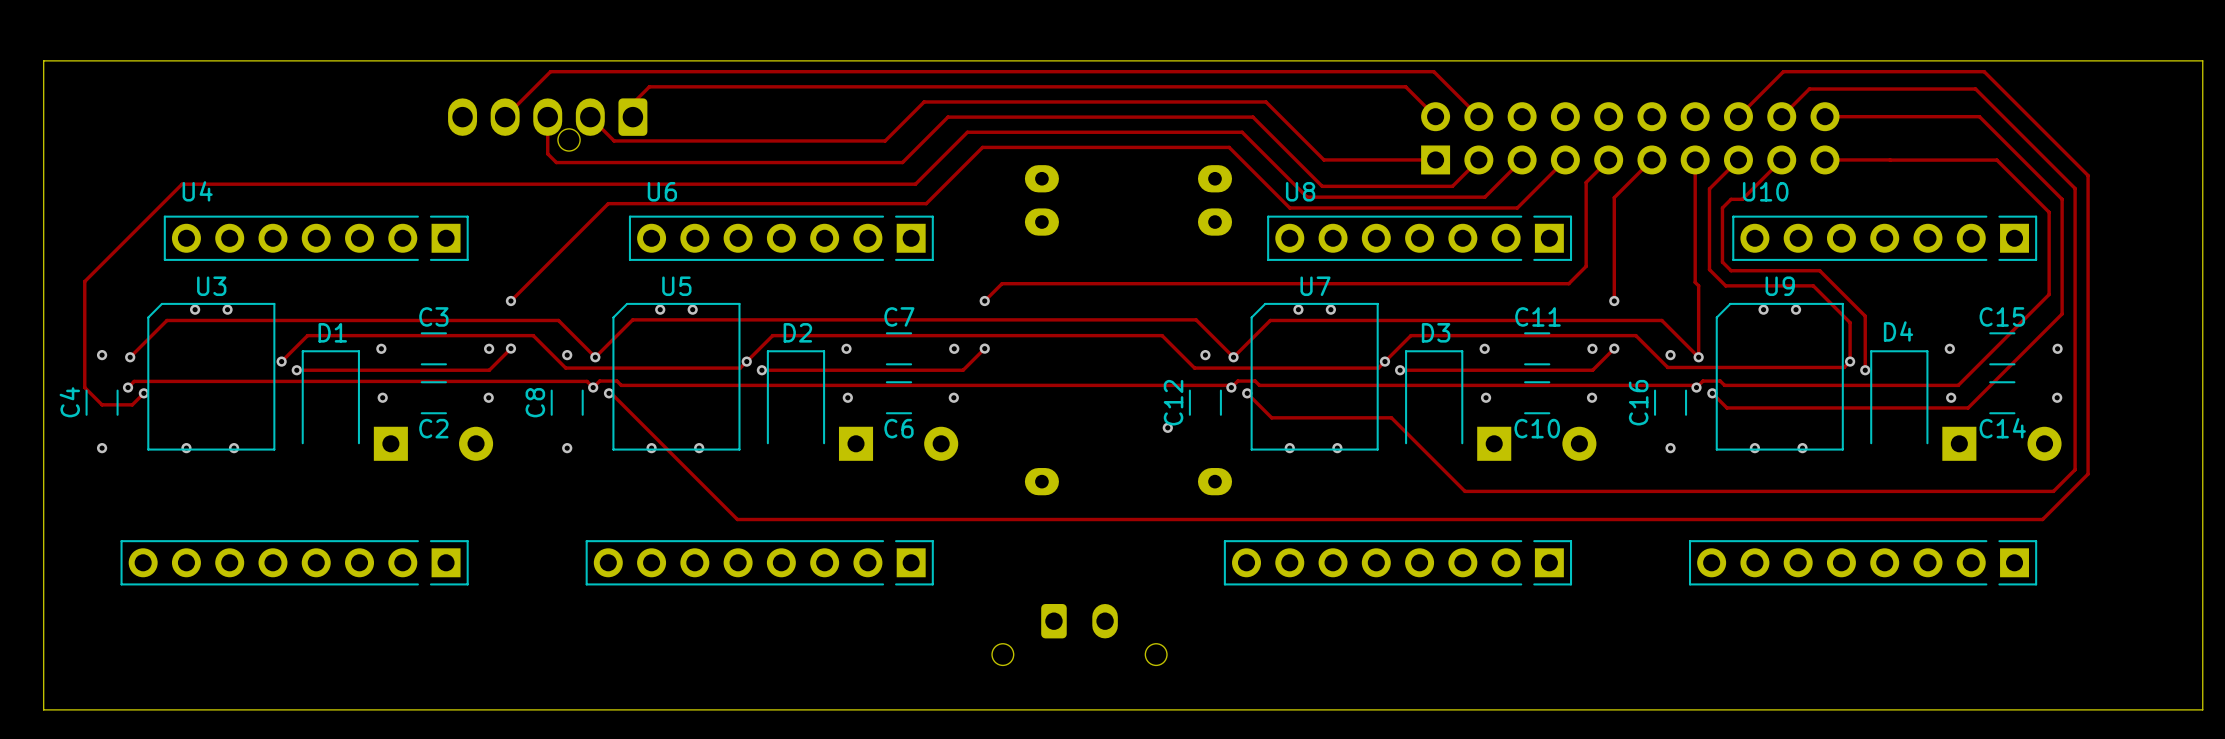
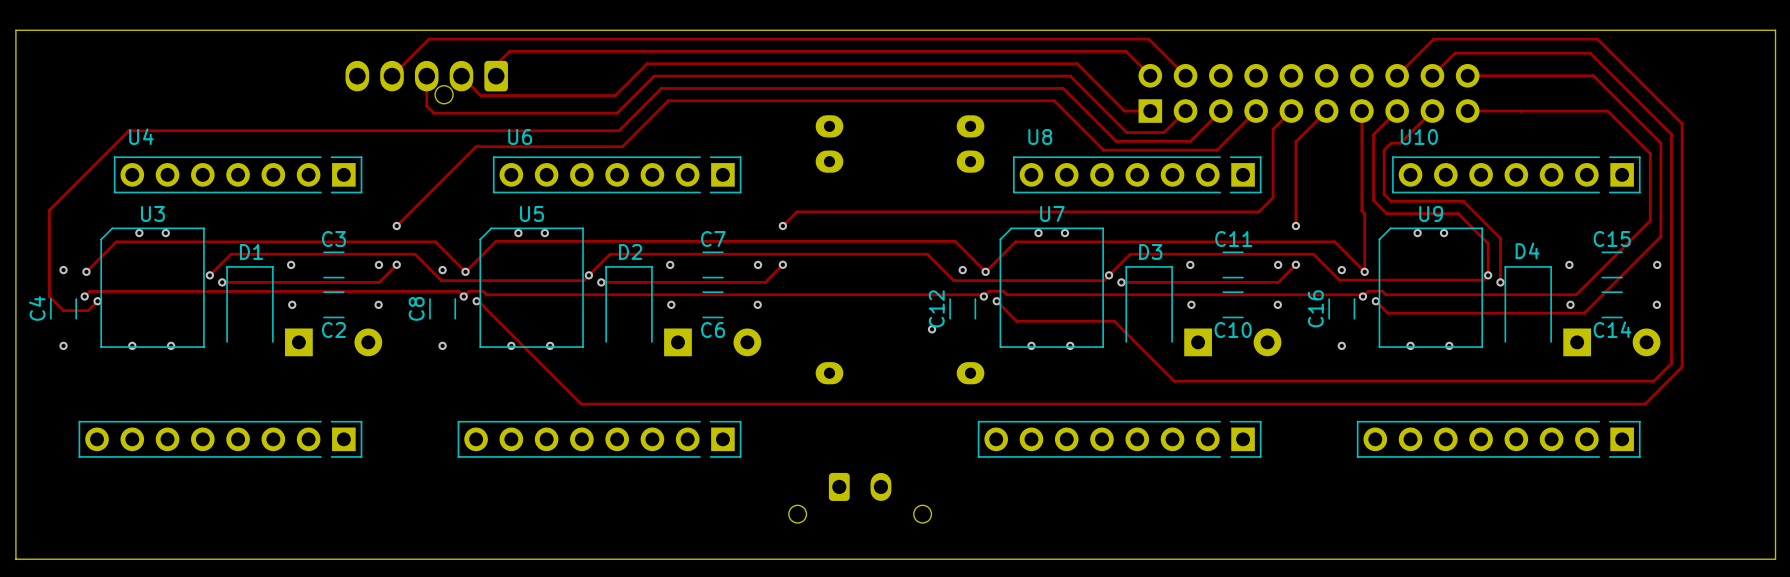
track: (924, 101) (885, 140) (779, 140) -> (733, 63) (647, 63) (615, 95)
track: (1265, 101) (1323, 159) (1404, 159) -> (1012, 63) (1077, 63) (1124, 111)
track: (947, 117) (902, 162) (781, 162) -> (752, 76) (654, 76) (617, 113)
track: (1253, 117) (1322, 186) (1406, 186) -> (1001, 76) (1070, 76) (1126, 132)
track: (967, 132) (915, 184) (783, 184) -> (768, 88) (661, 88) (618, 130)
track: (1242, 132) (1307, 197) (1393, 197) -> (992, 88) (1063, 88) (1116, 141)
track: (982, 147) (926, 203) (787, 203) -> (781, 100) (668, 100) (622, 146)
track: (1229, 147) (1289, 207) (1378, 207) -> (982, 100) (1054, 100) (1103, 150)

